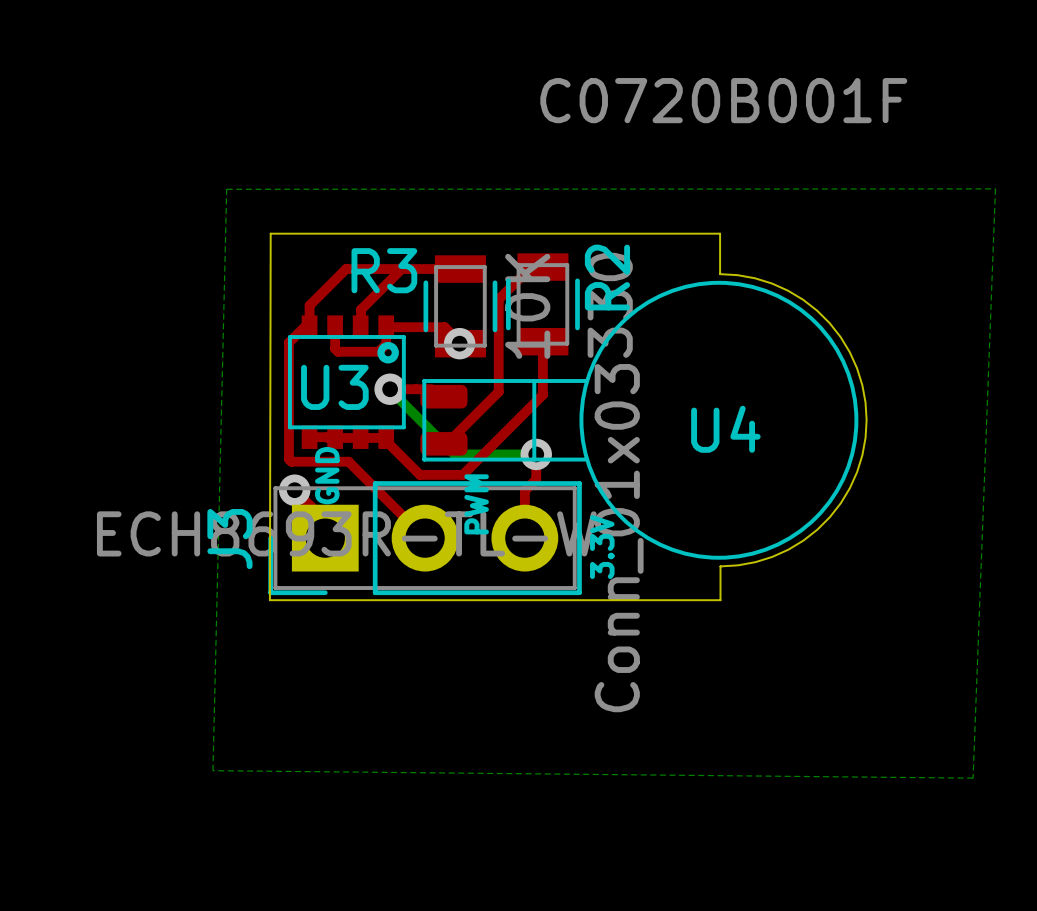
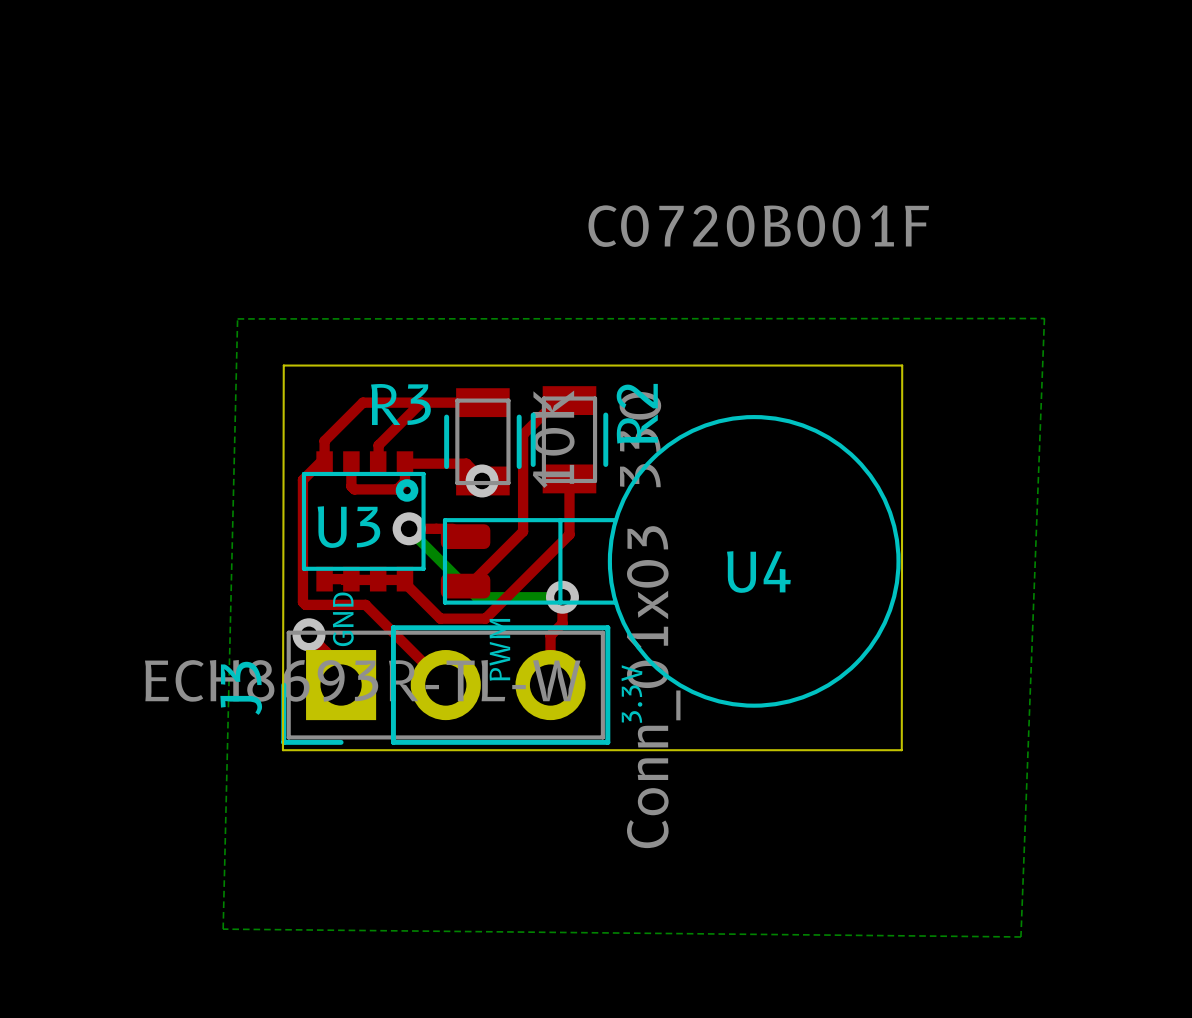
board edge: (720, 233) (720, 274) (755, 278) (788, 290) (817, 310) (840, 337) (849, 352) (862, 385) (866, 420) (862, 455) (857, 471) (840, 503) (829, 517) (803, 540) (788, 549) (755, 562) (720, 566) (720, 600) -> (755, 365) (902, 365) (901, 750) (755, 750)

